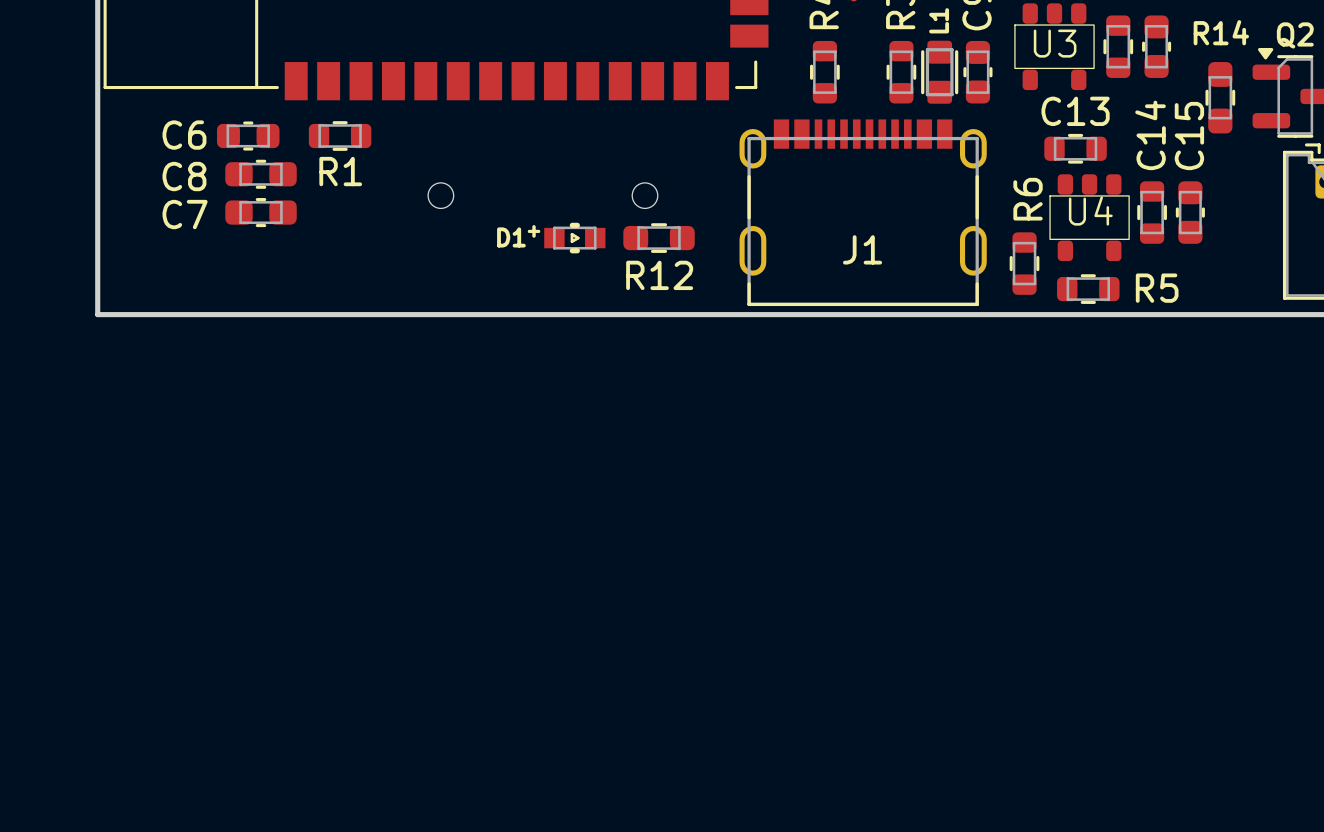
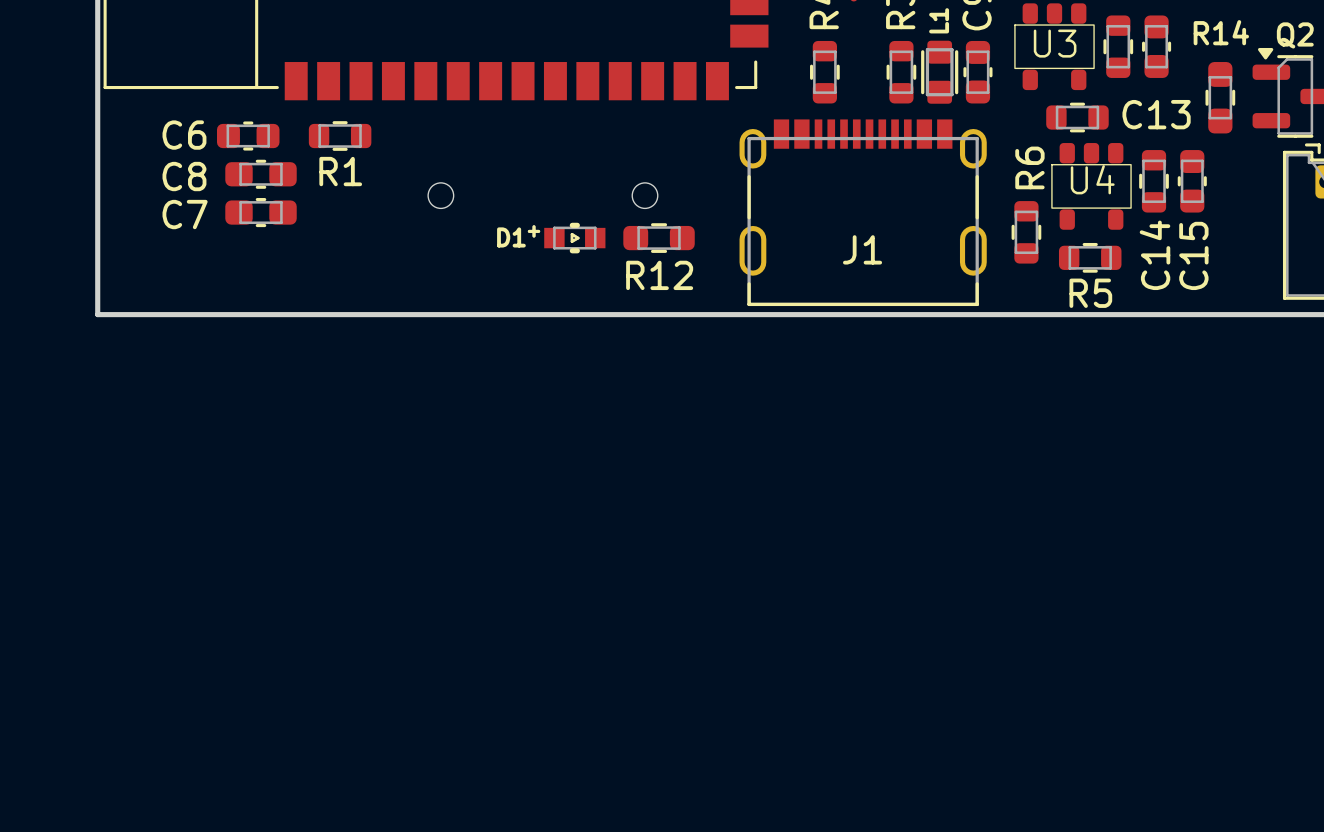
C13 name position: C13 (1075, 111) -> C13 (1156, 114)
C14 name position: C14 (1150, 135) -> C14 (1155, 255)
C15 name position: C15 (1189, 136) -> C15 (1193, 255)
C13 position: (1075, 148) -> (1077, 117)
C14 position: (1152, 212) -> (1154, 181)
C15 position: (1190, 212) -> (1192, 181)
U4 position: (1089, 217) -> (1091, 186)
R6 position: (1024, 263) -> (1026, 232)
R5 name position: R5 (1157, 288) -> R5 (1090, 293)
R5 position: (1088, 289) -> (1090, 257)

